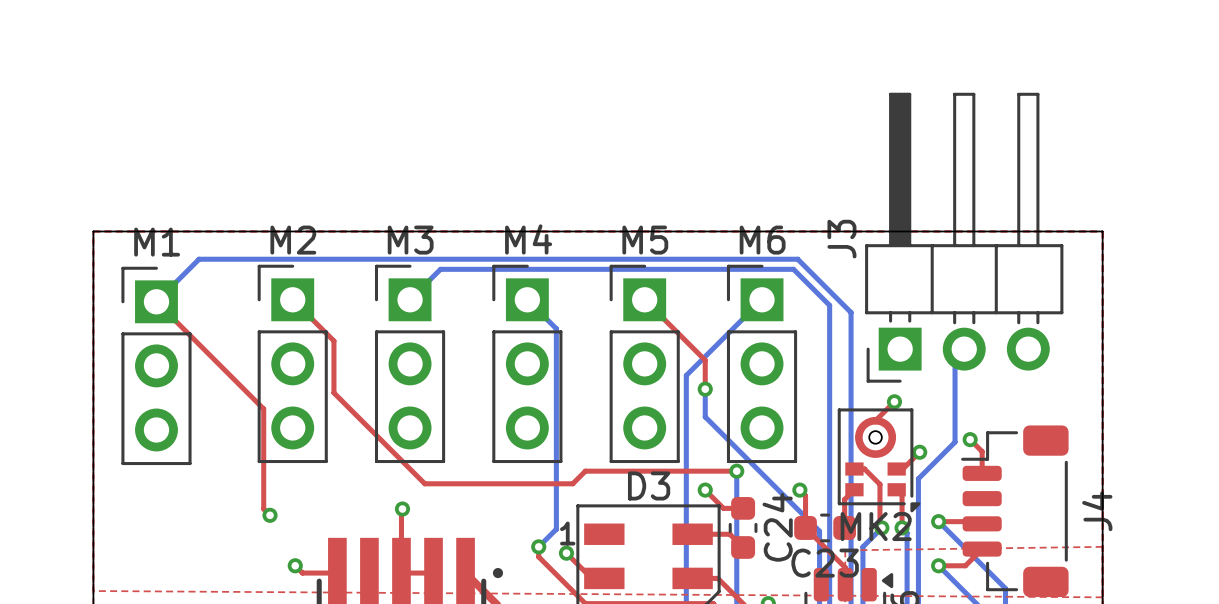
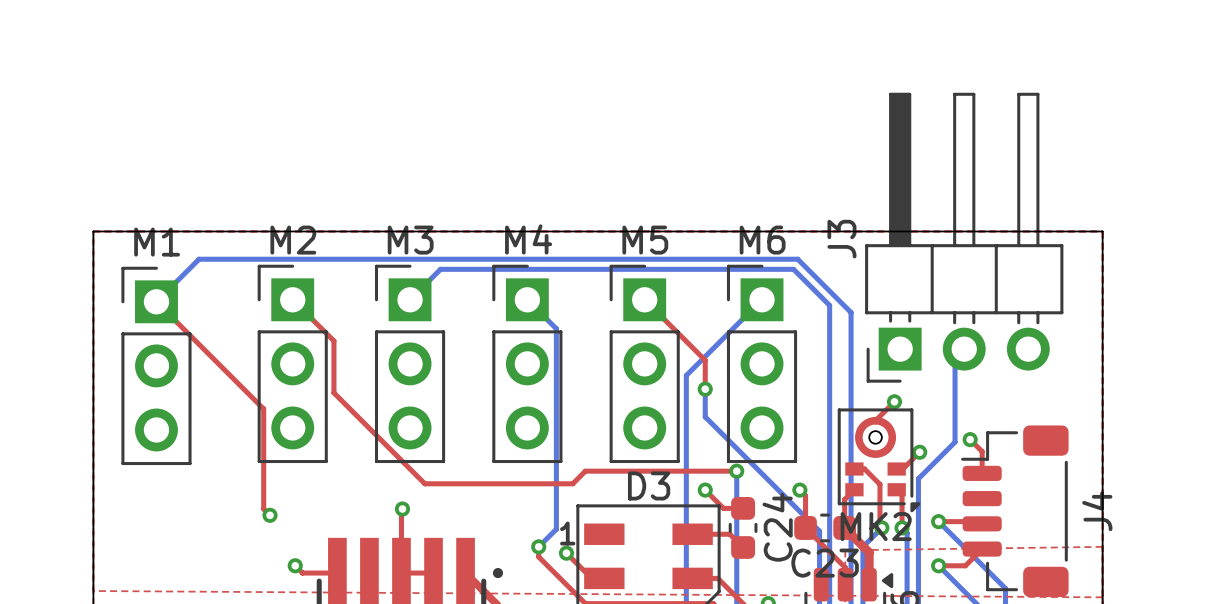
top track: none -> (844, 527) (869, 552) (869, 584)

